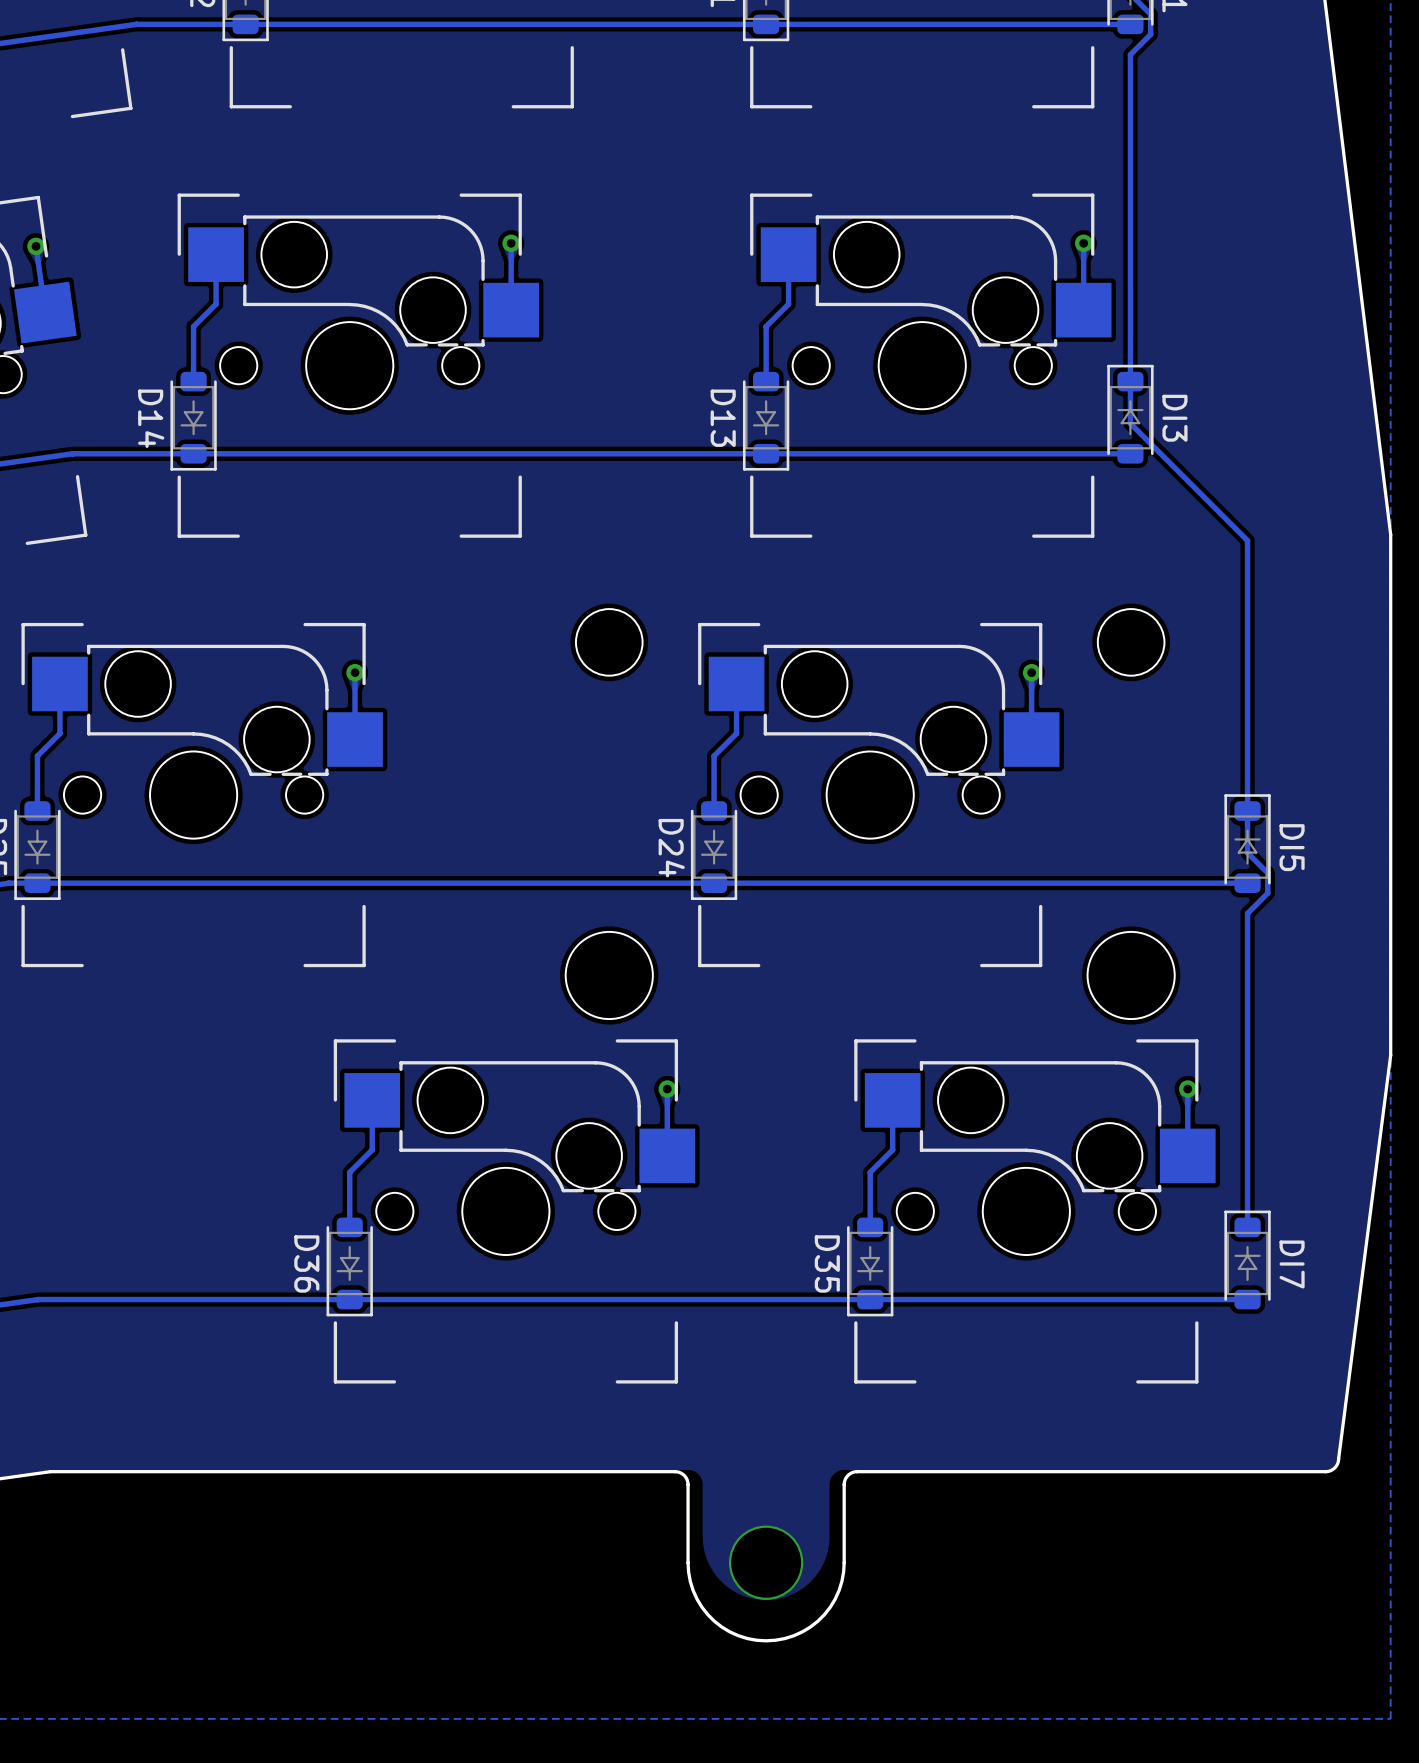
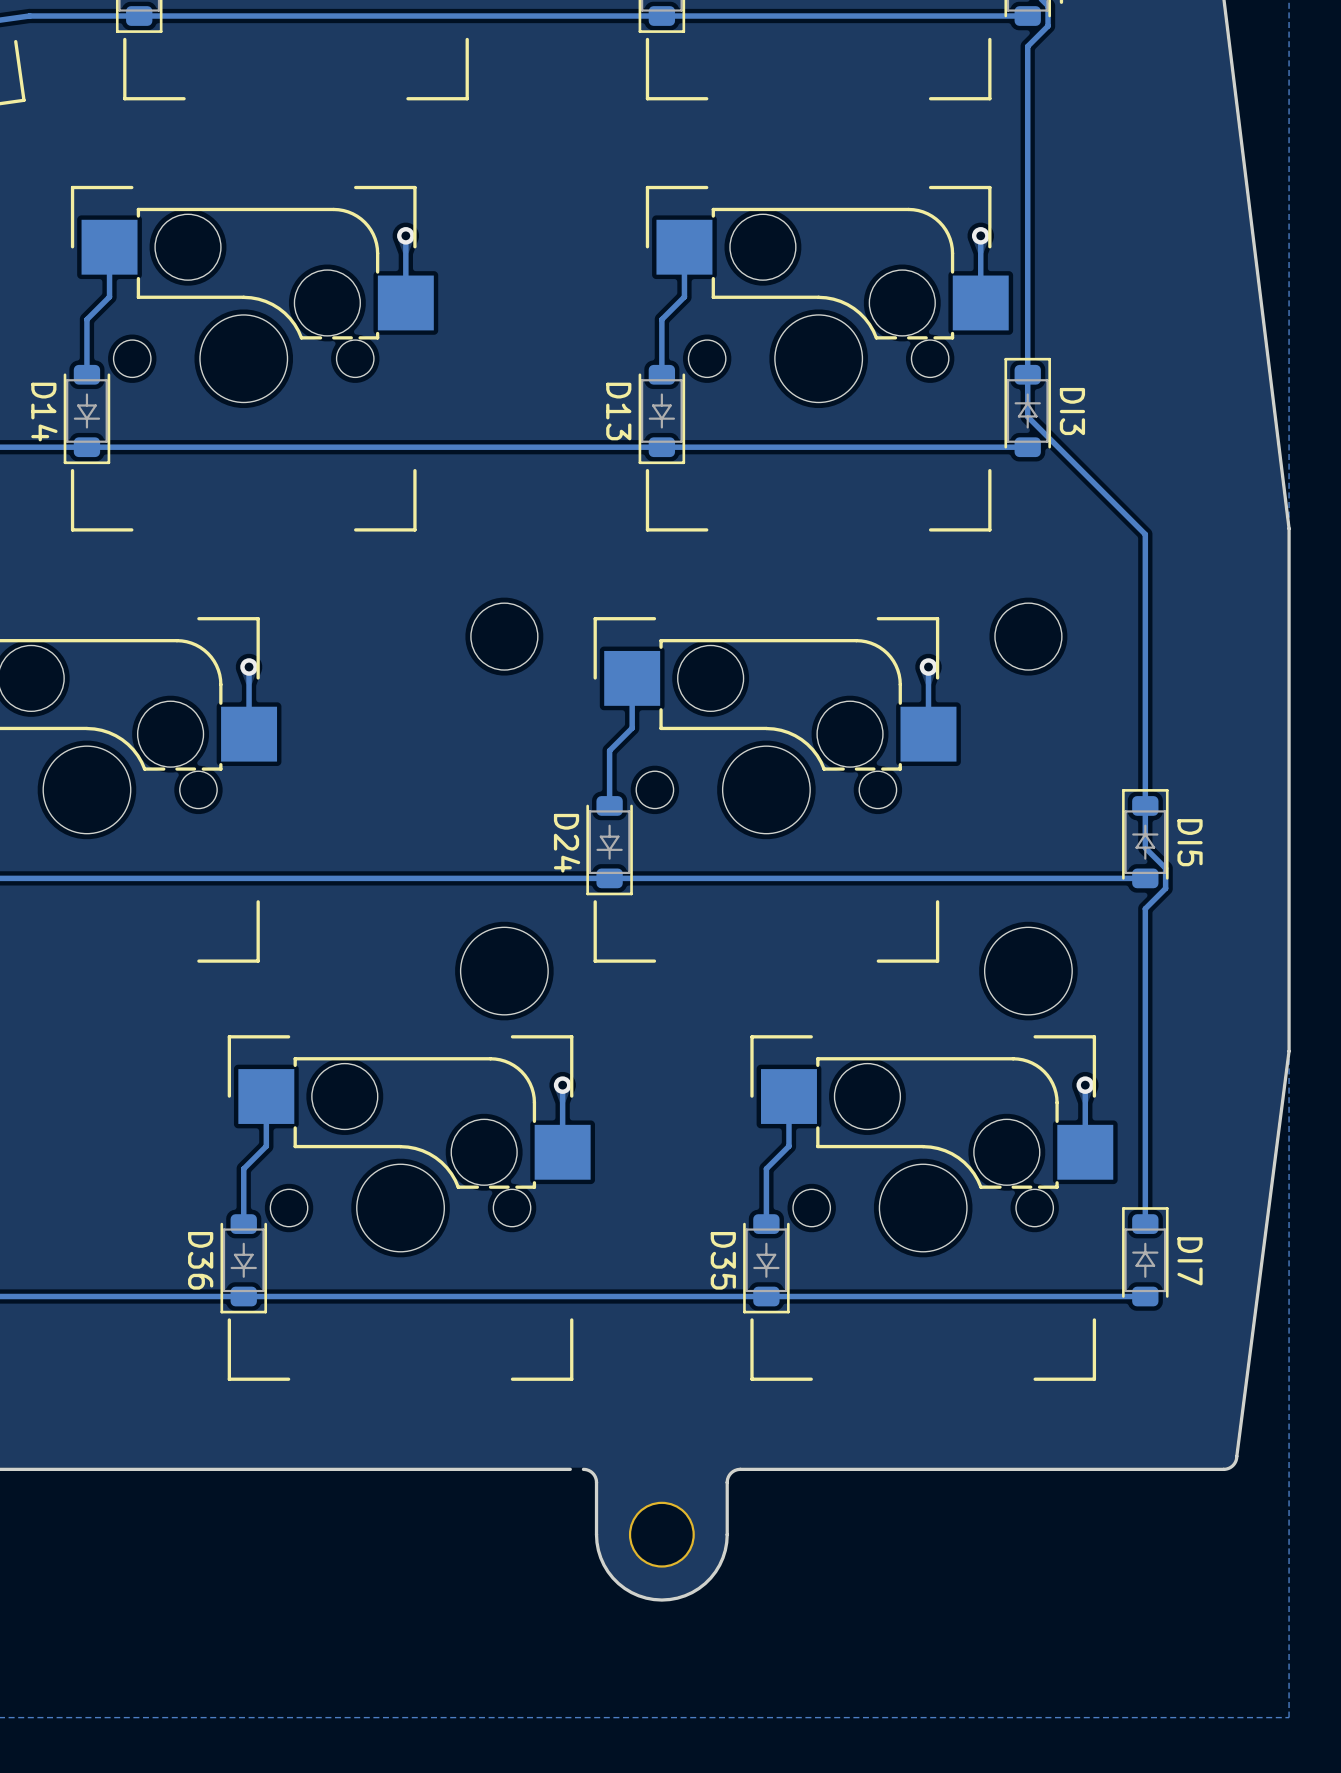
board edge: (857, 1471) (849, 1474) (844, 1482) (843, 1572) (835, 1599) (817, 1621) (802, 1631) (784, 1638) (766, 1640) (747, 1638) (729, 1631) (707, 1614) (696, 1599) (688, 1572) (687, 1482) (682, 1474) (675, 1471) -> (753, 1469) (736, 1469) (728, 1477) (726, 1542) (722, 1557) (715, 1571) (705, 1583) (692, 1592) (677, 1598) (661, 1600) (646, 1598) (631, 1592) (612, 1578) (604, 1565) (597, 1542) (596, 1479) (591, 1472) (583, 1469)
part: none -> (661, 1534)
part: (766, 1562) -> none

